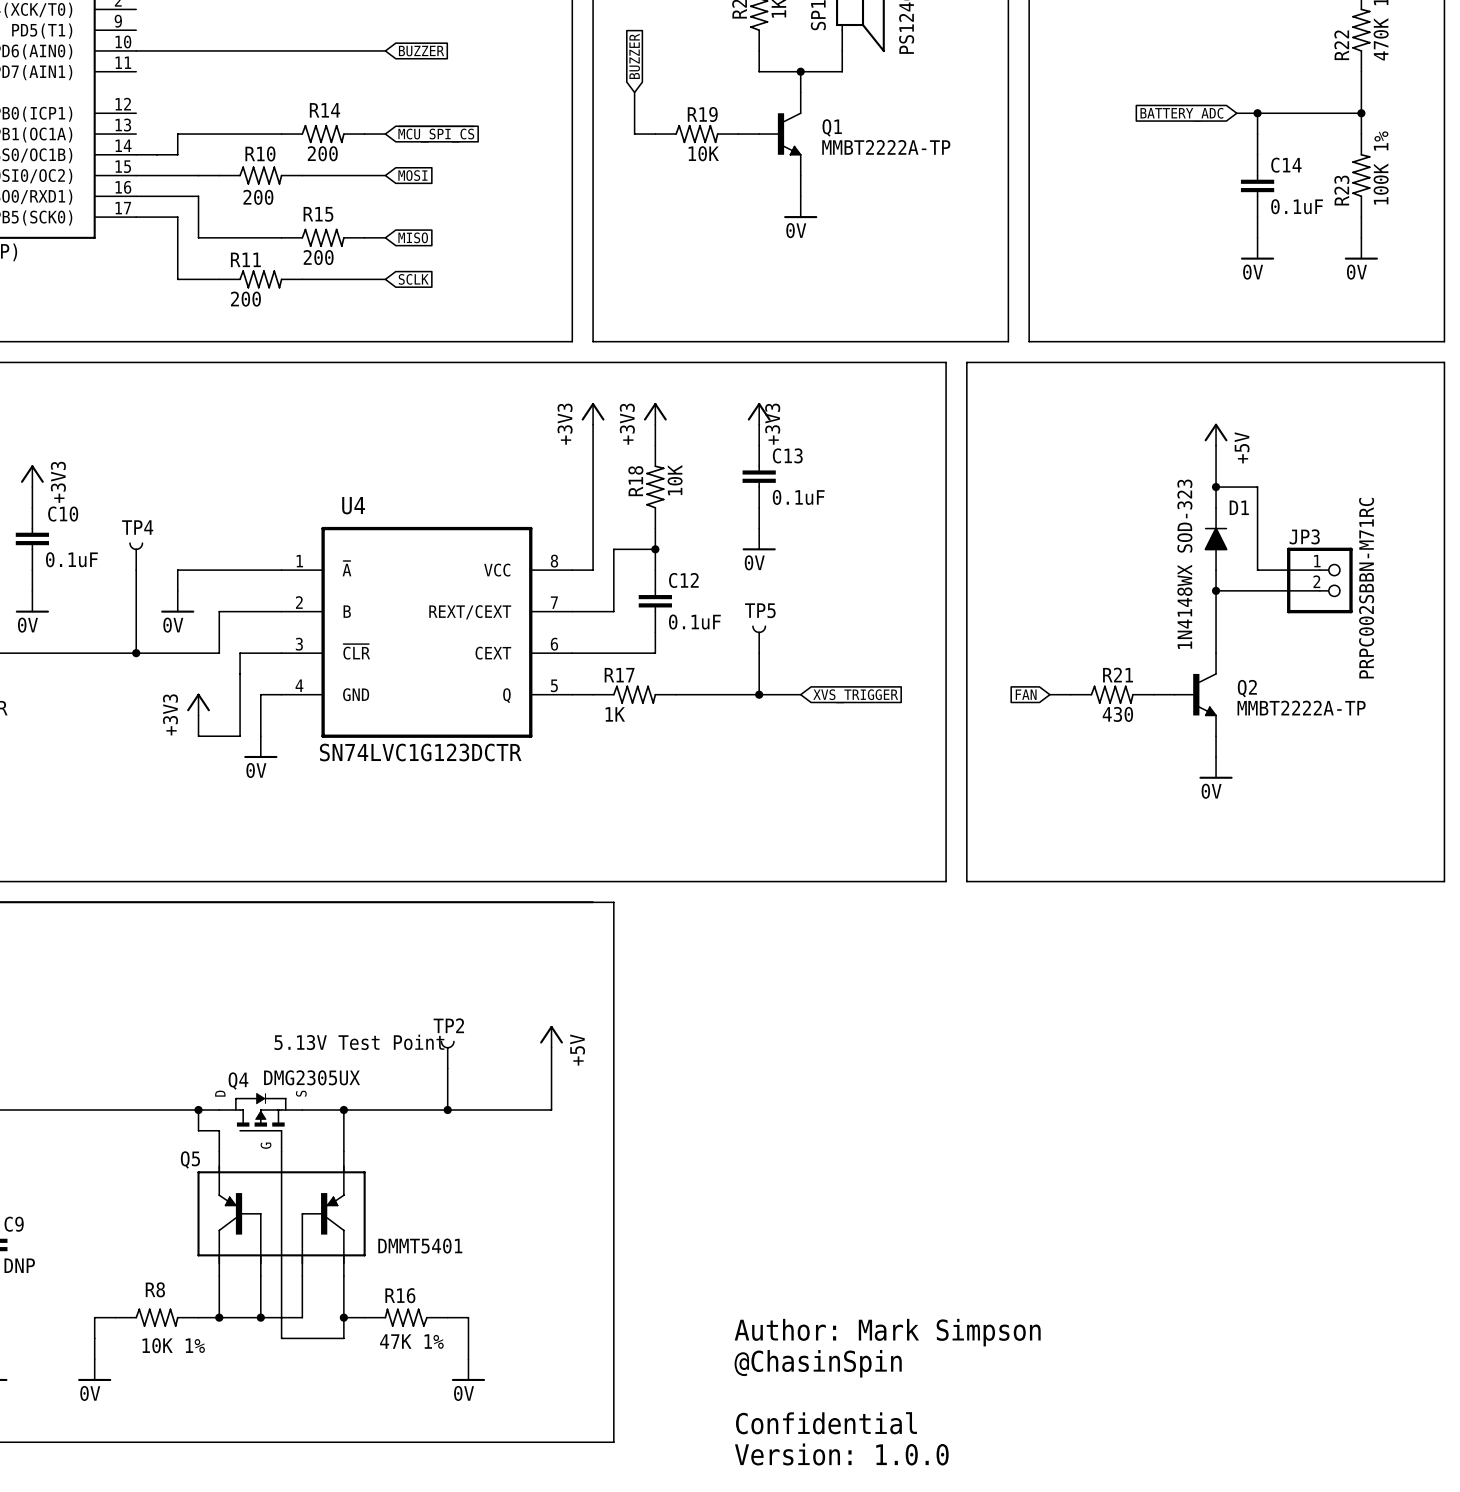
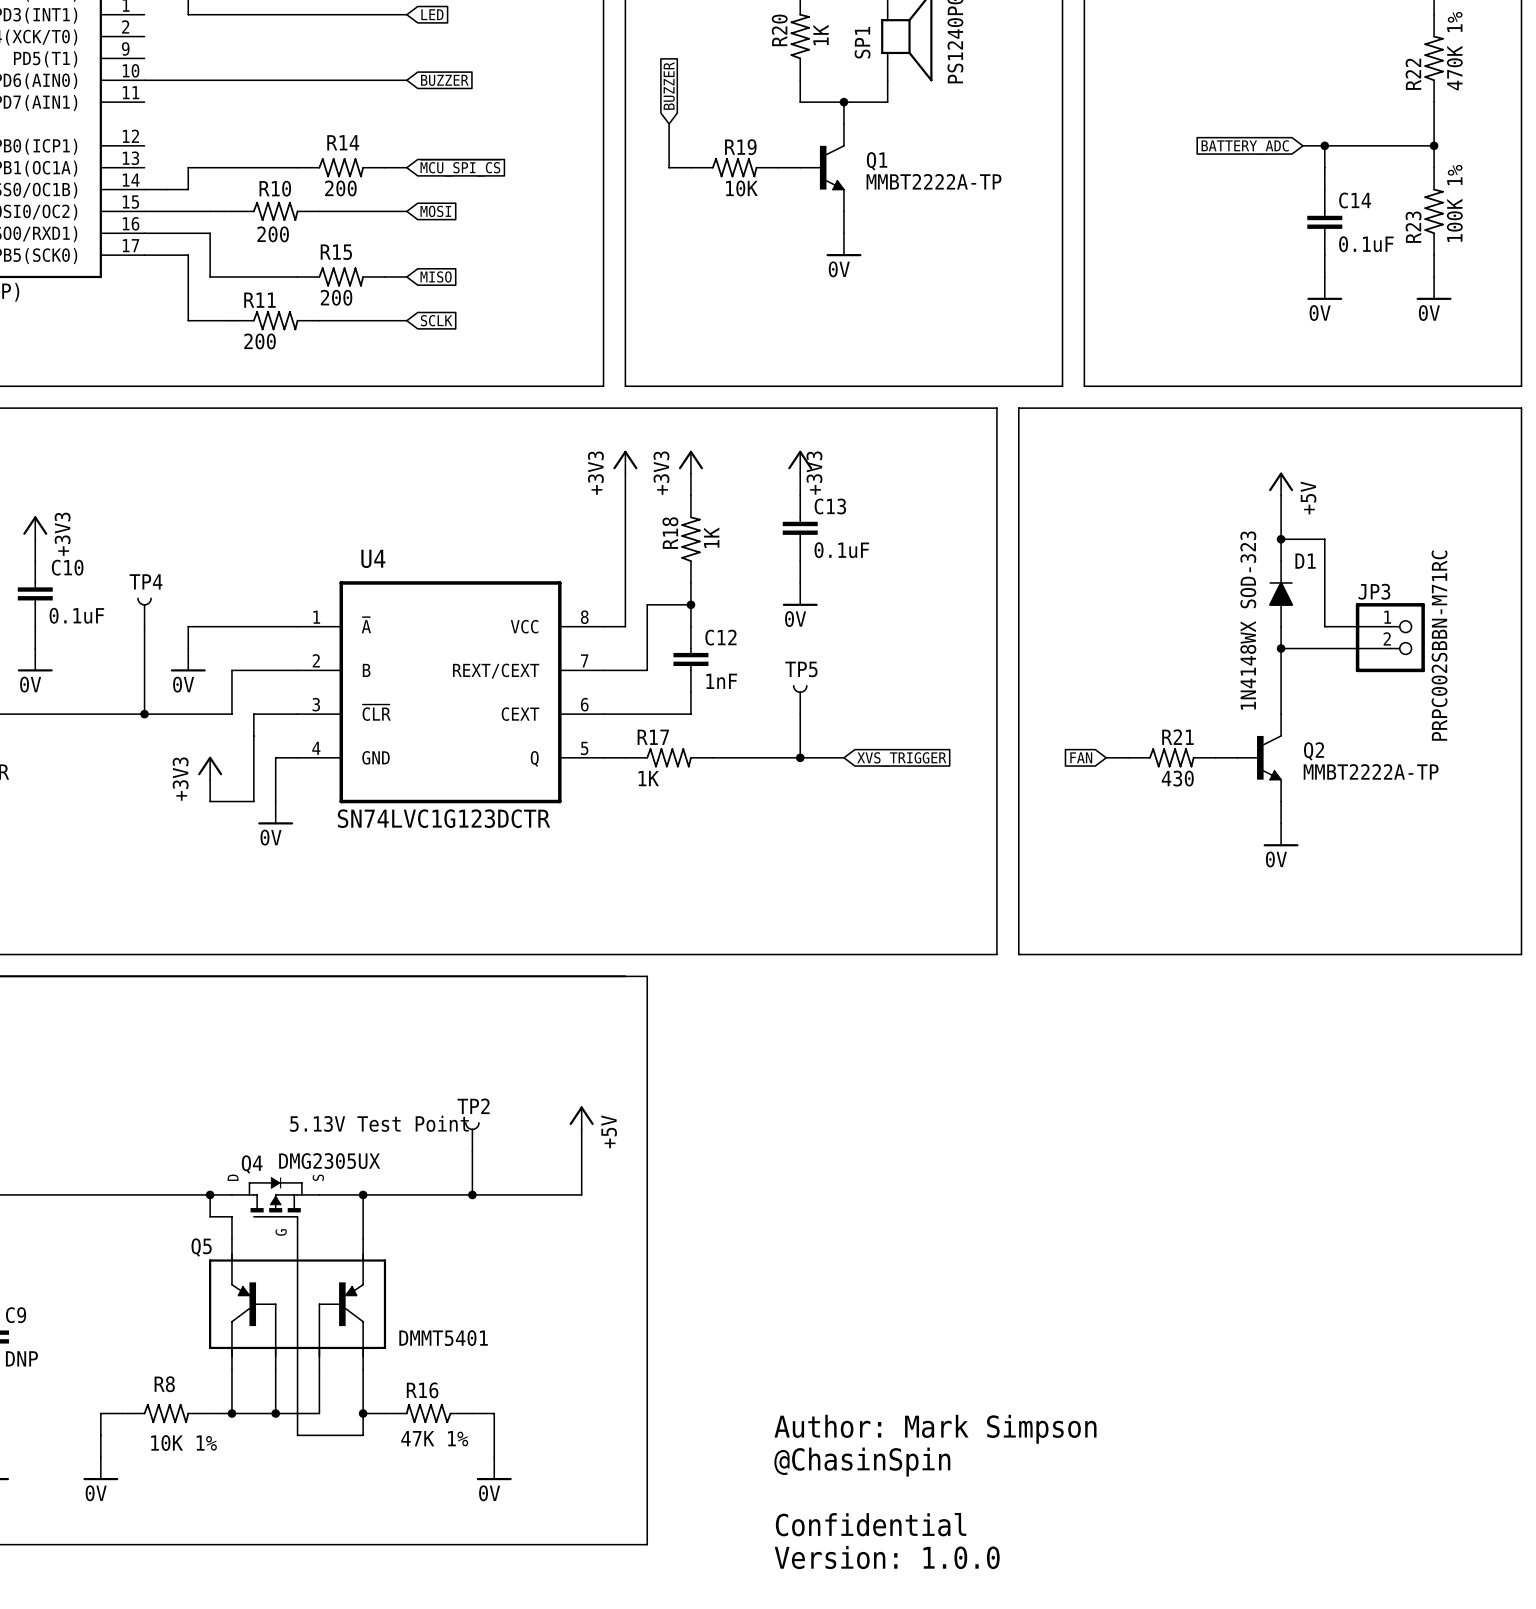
R18 value: 10K (675, 480) -> 1K (711, 537)
C12 value: 0.1uF (694, 622) -> 1nF (721, 681)

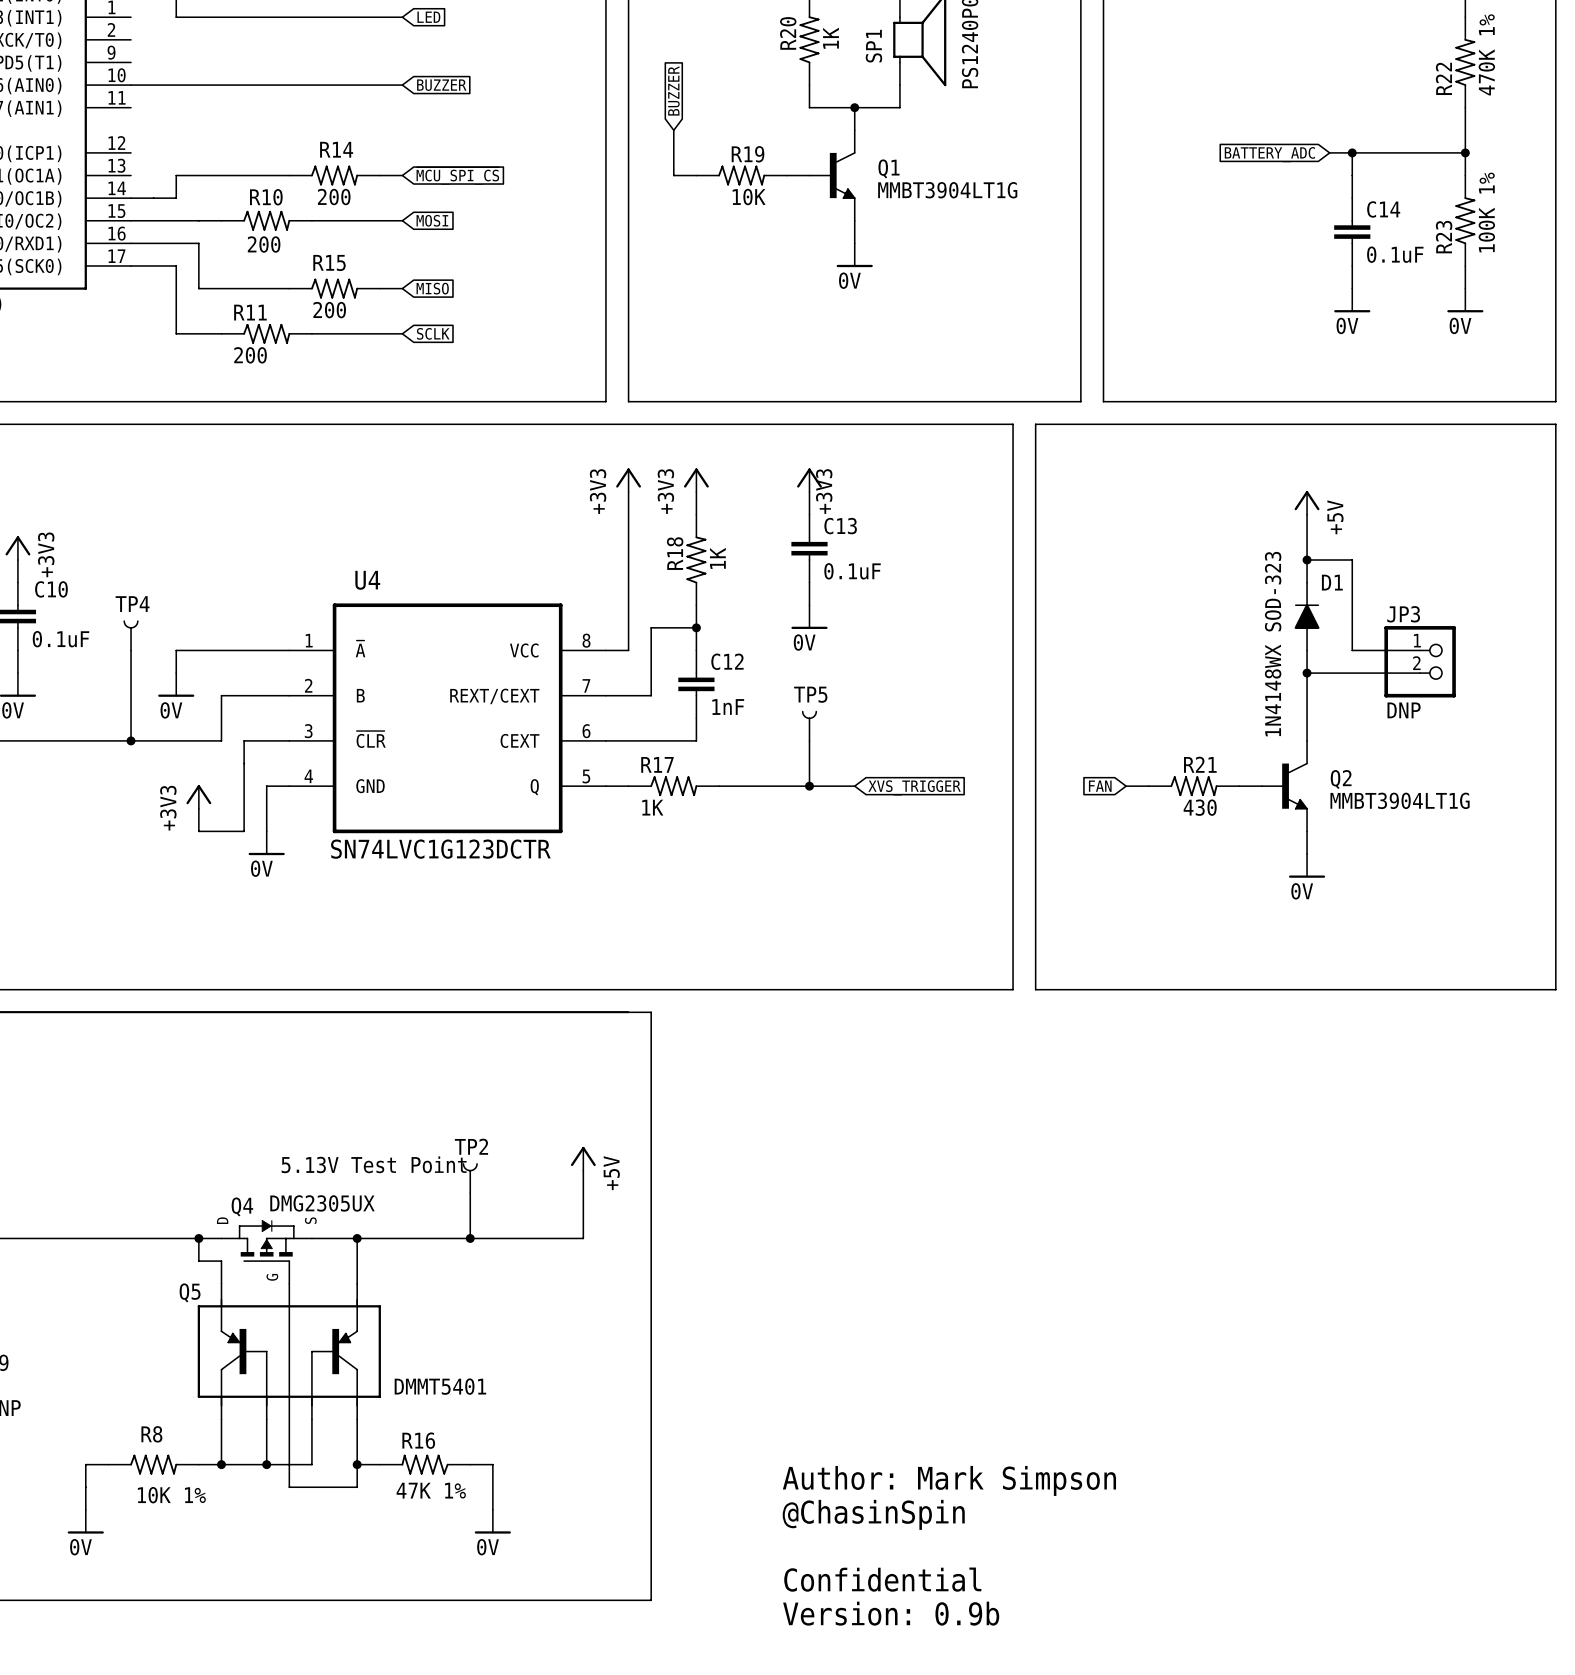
Q1 value: MMBT2222A-TP (934, 181) -> MMBT3904LT1G (947, 190)
JP3 value: PRPC002SBBN-M71RC (1439, 645) -> DNP (1404, 710)
Q2 value: MMBT2222A-TP (1371, 771) -> MMBT3904LT1G (1400, 800)
text: Version: 1.0.0 (887, 1557) -> Version: 0.9b (891, 1613)

